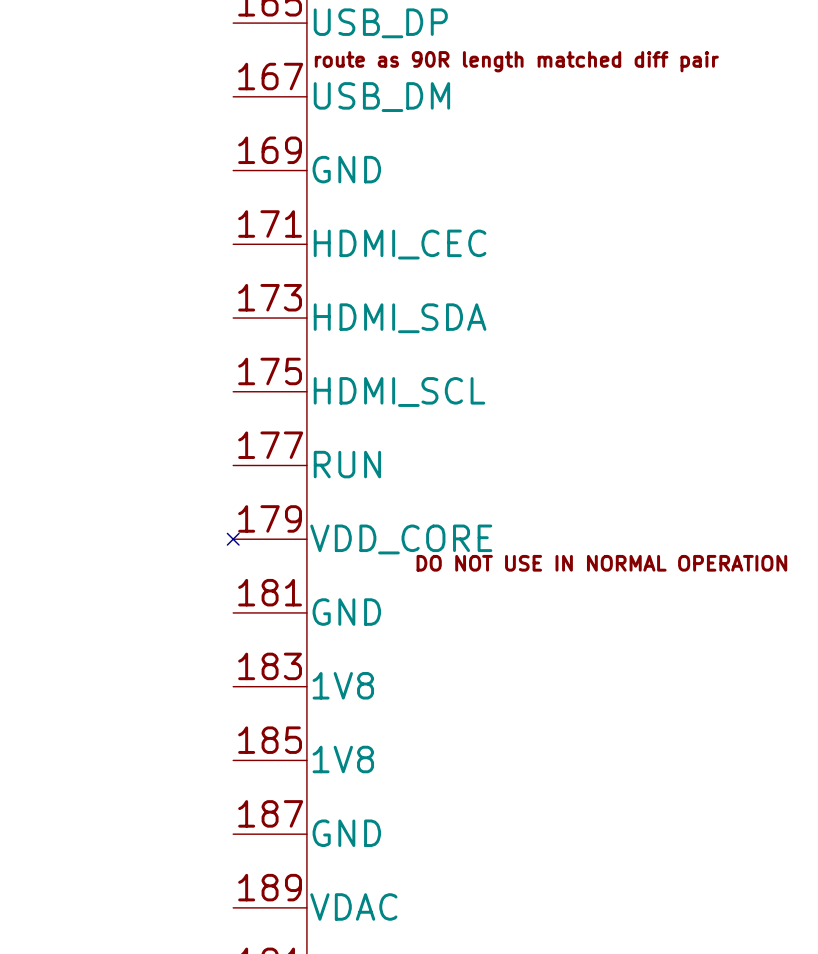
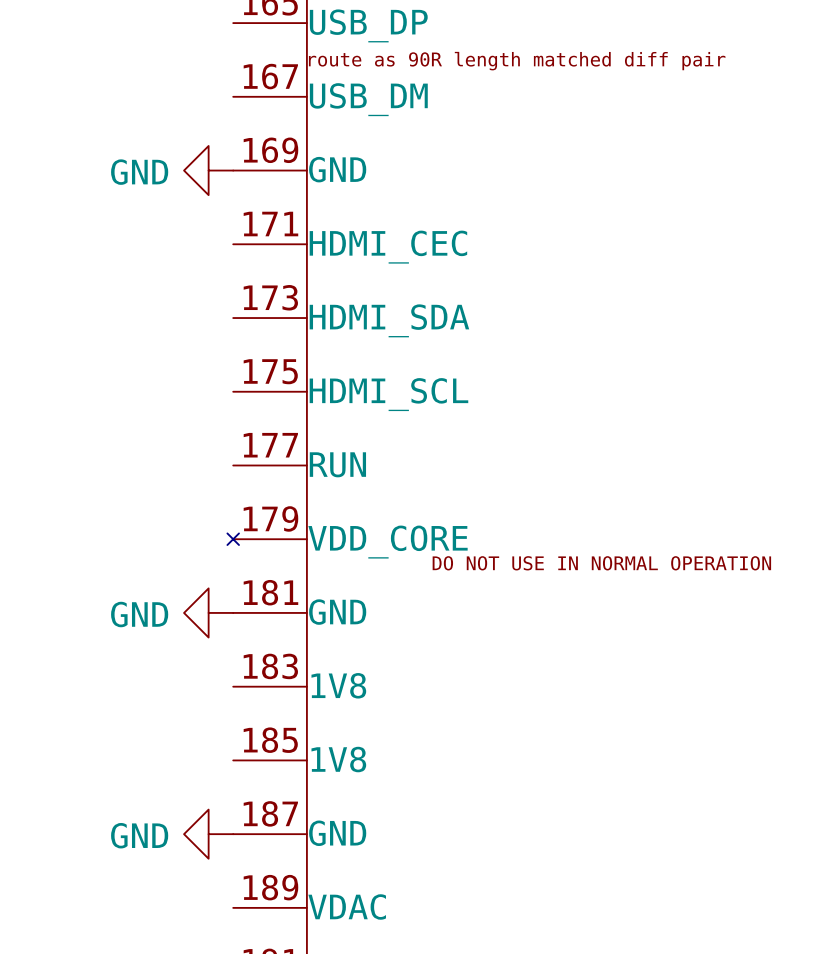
power symbol: none -> GND (208, 170)
power symbol: none -> GND (208, 612)
power symbol: none -> GND (208, 834)

